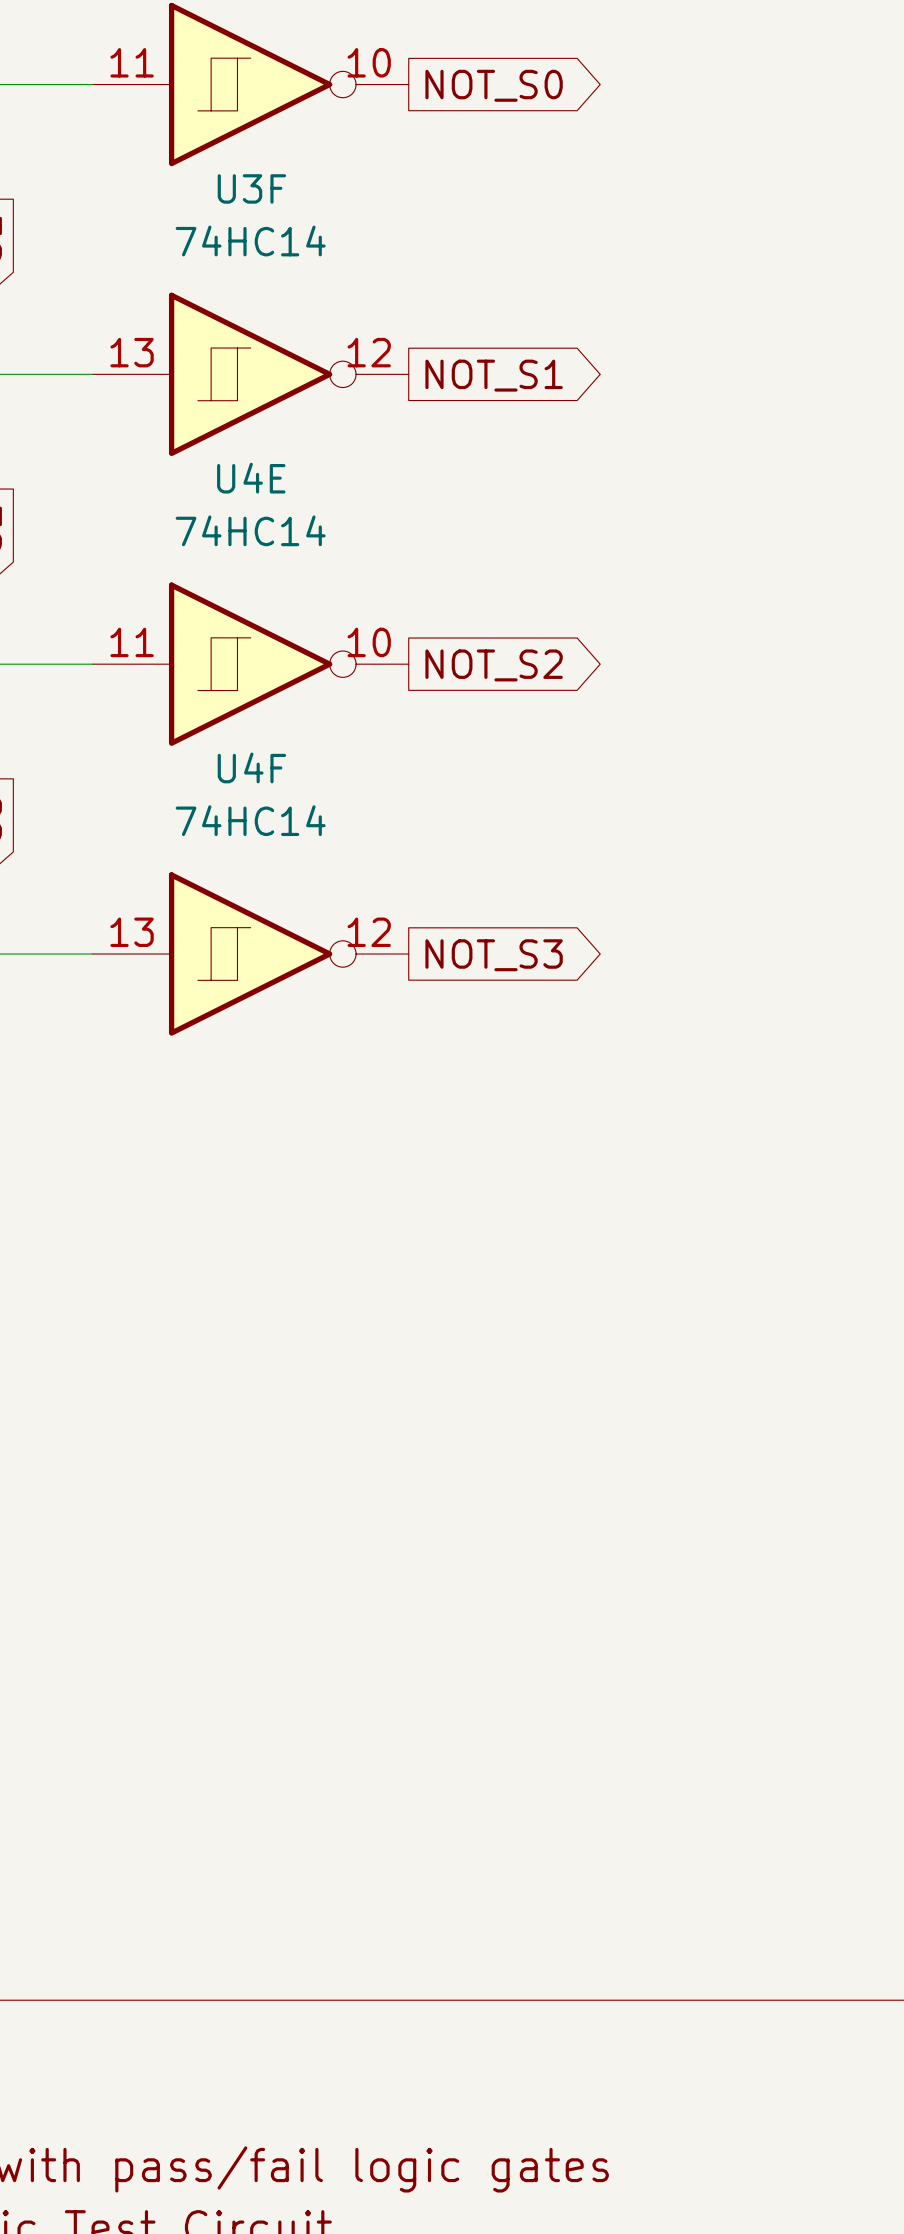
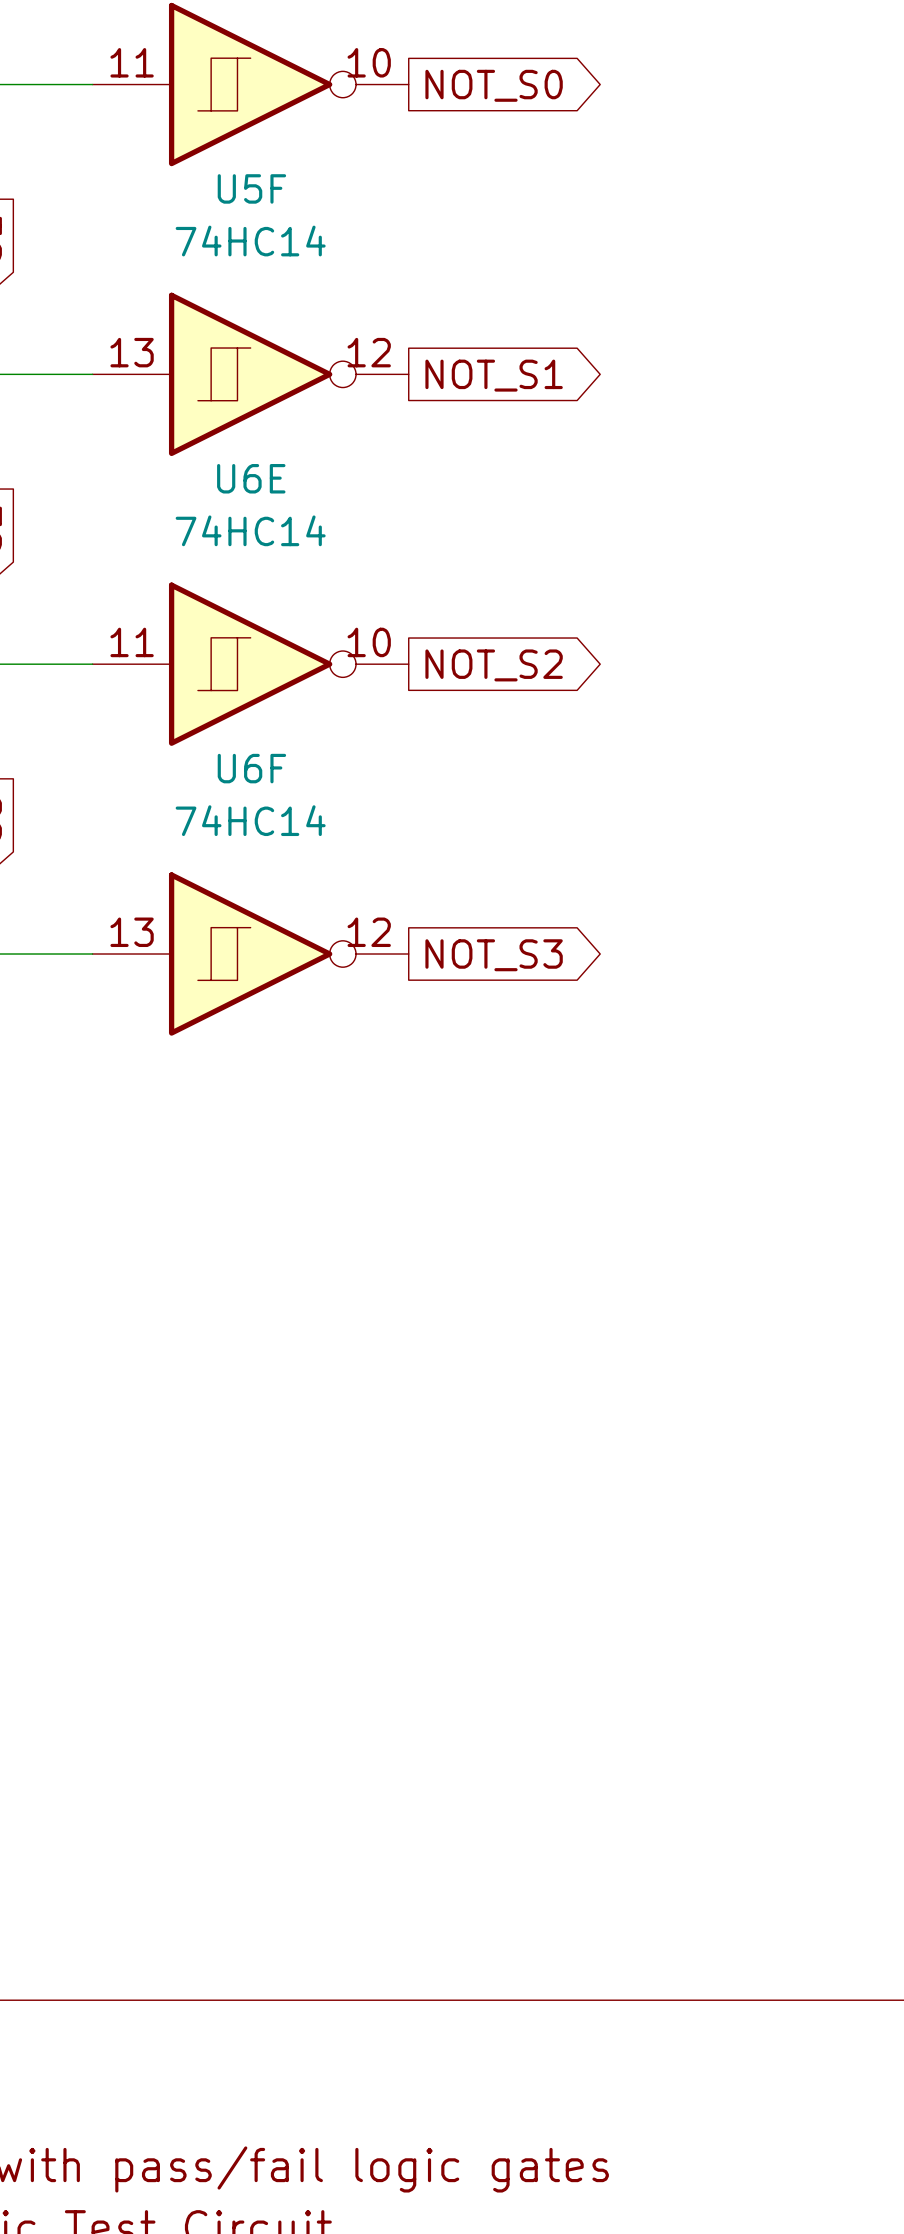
U3F name: U3F (251, 188) -> U5F (251, 188)
U4E name: U4E (251, 478) -> U6E (251, 478)
U4F name: U4F (251, 767) -> U6F (251, 768)

